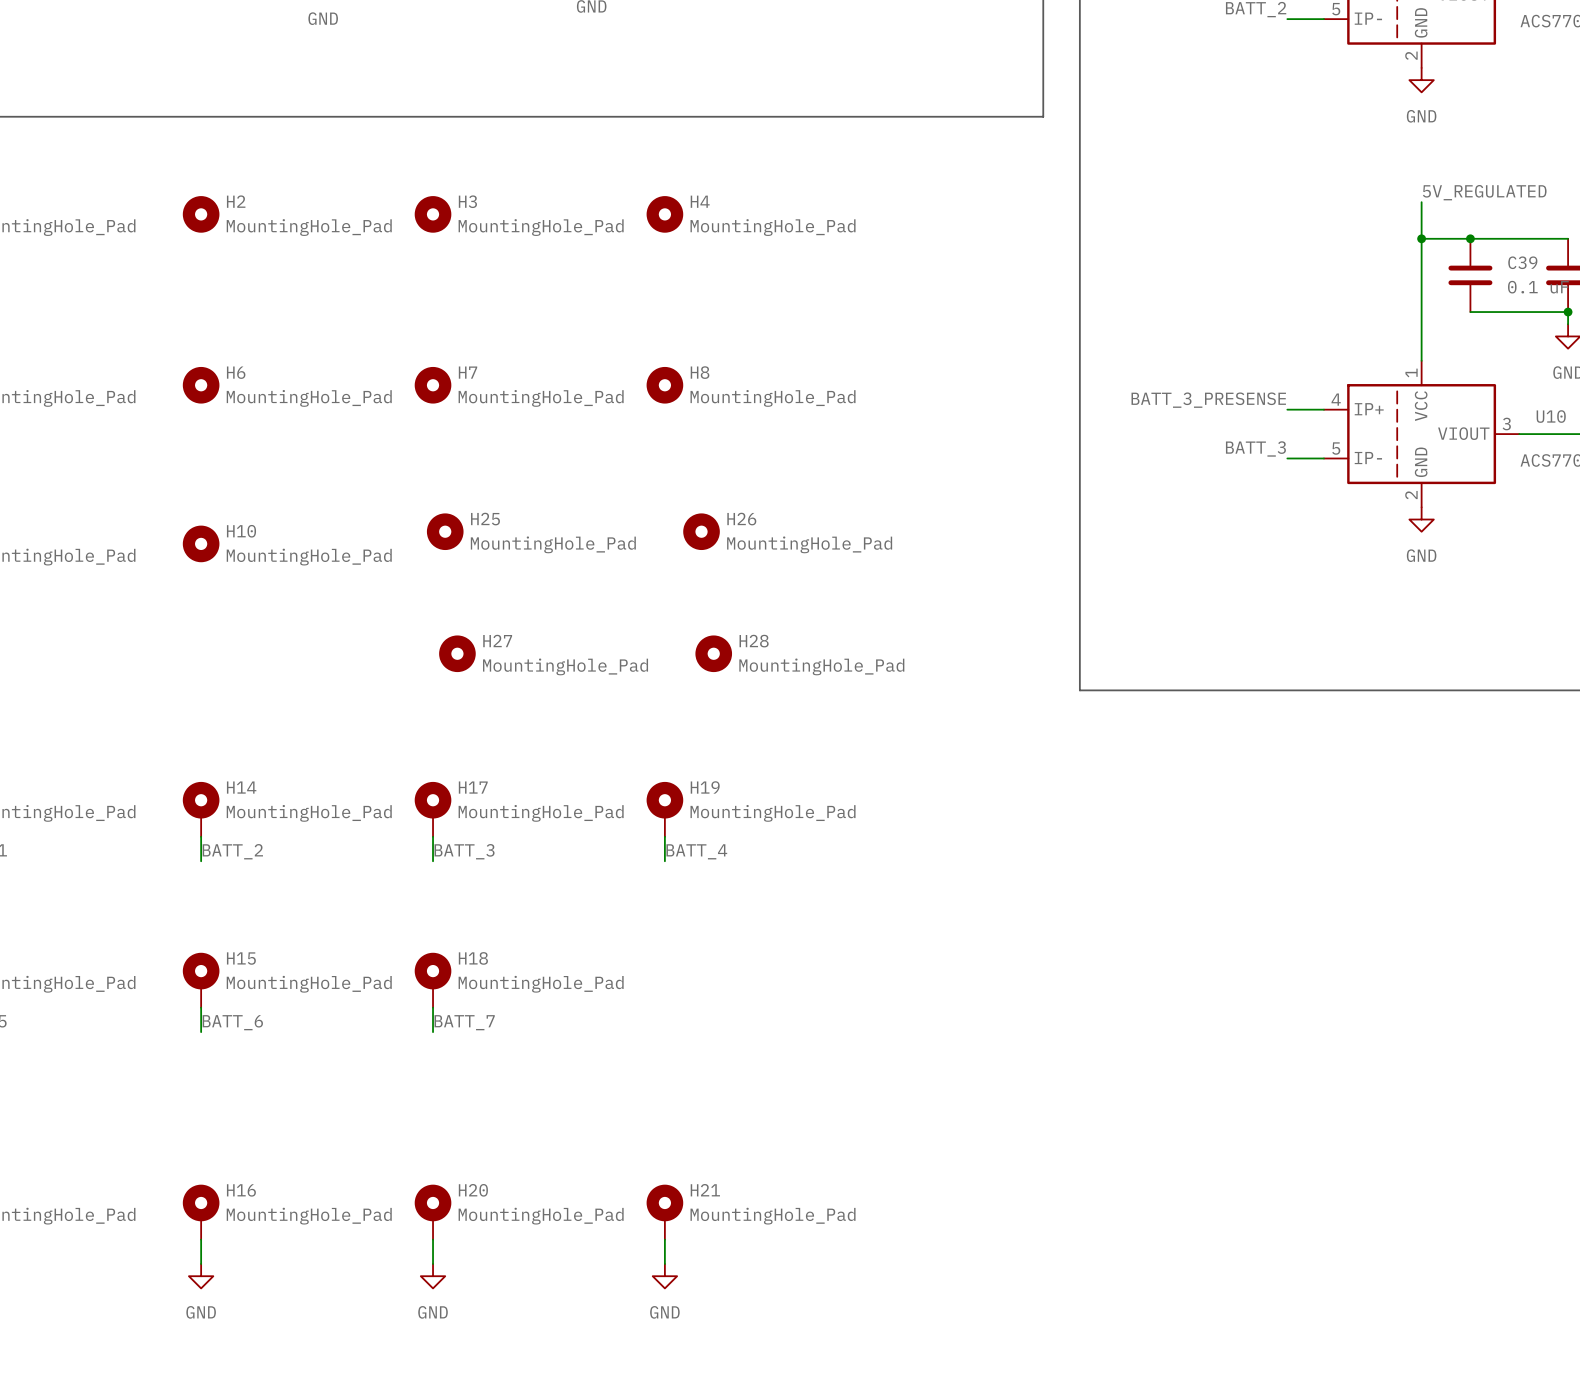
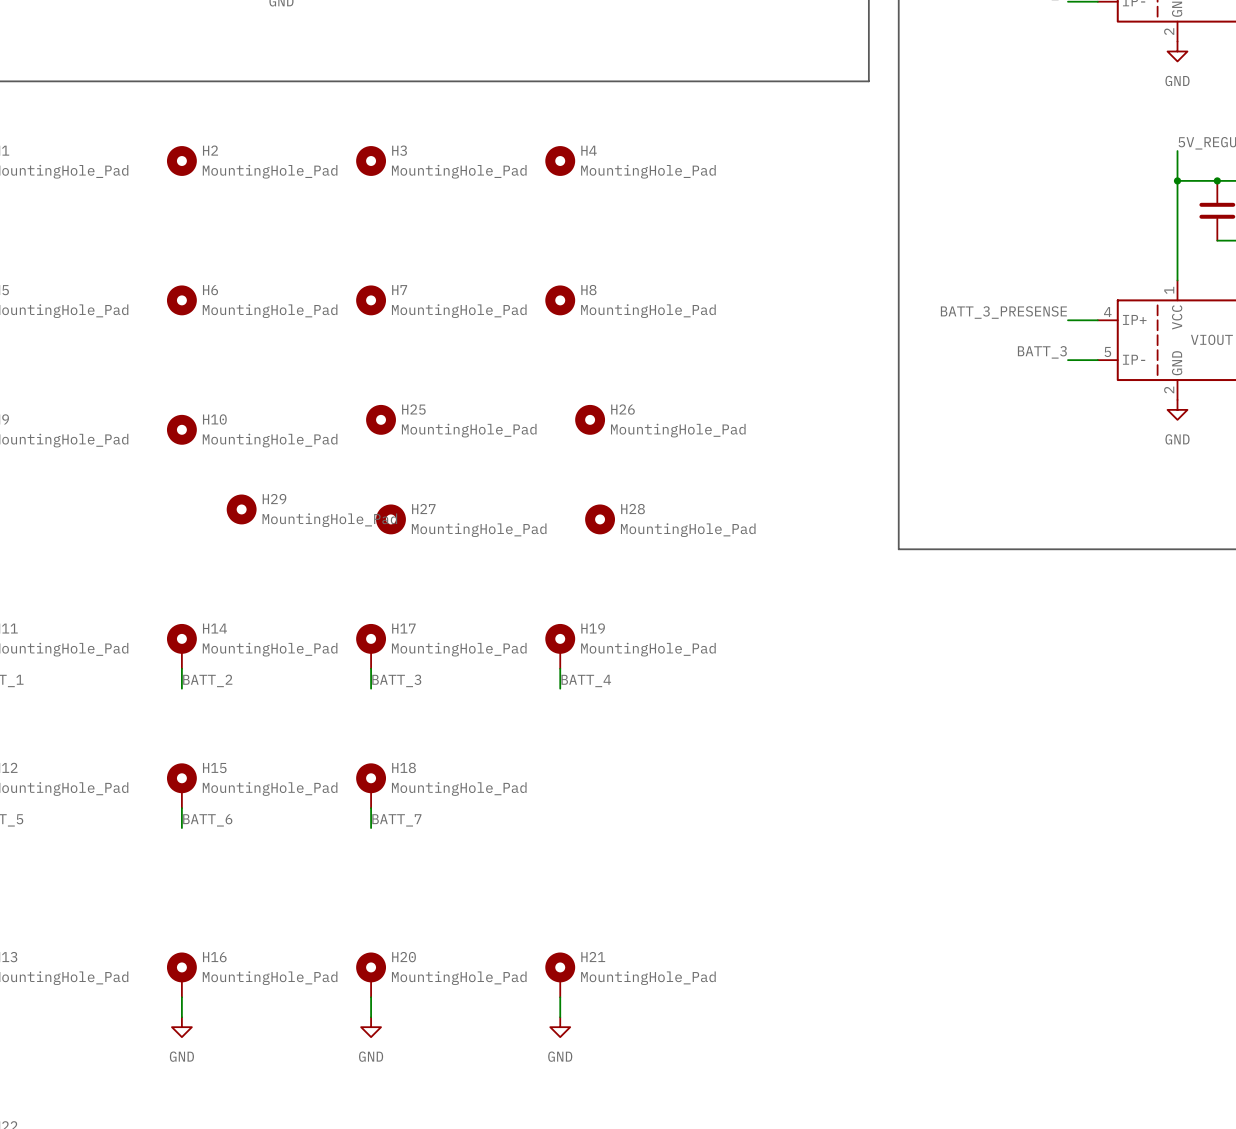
H29: none -> MountingHole_Pad (241, 509)

